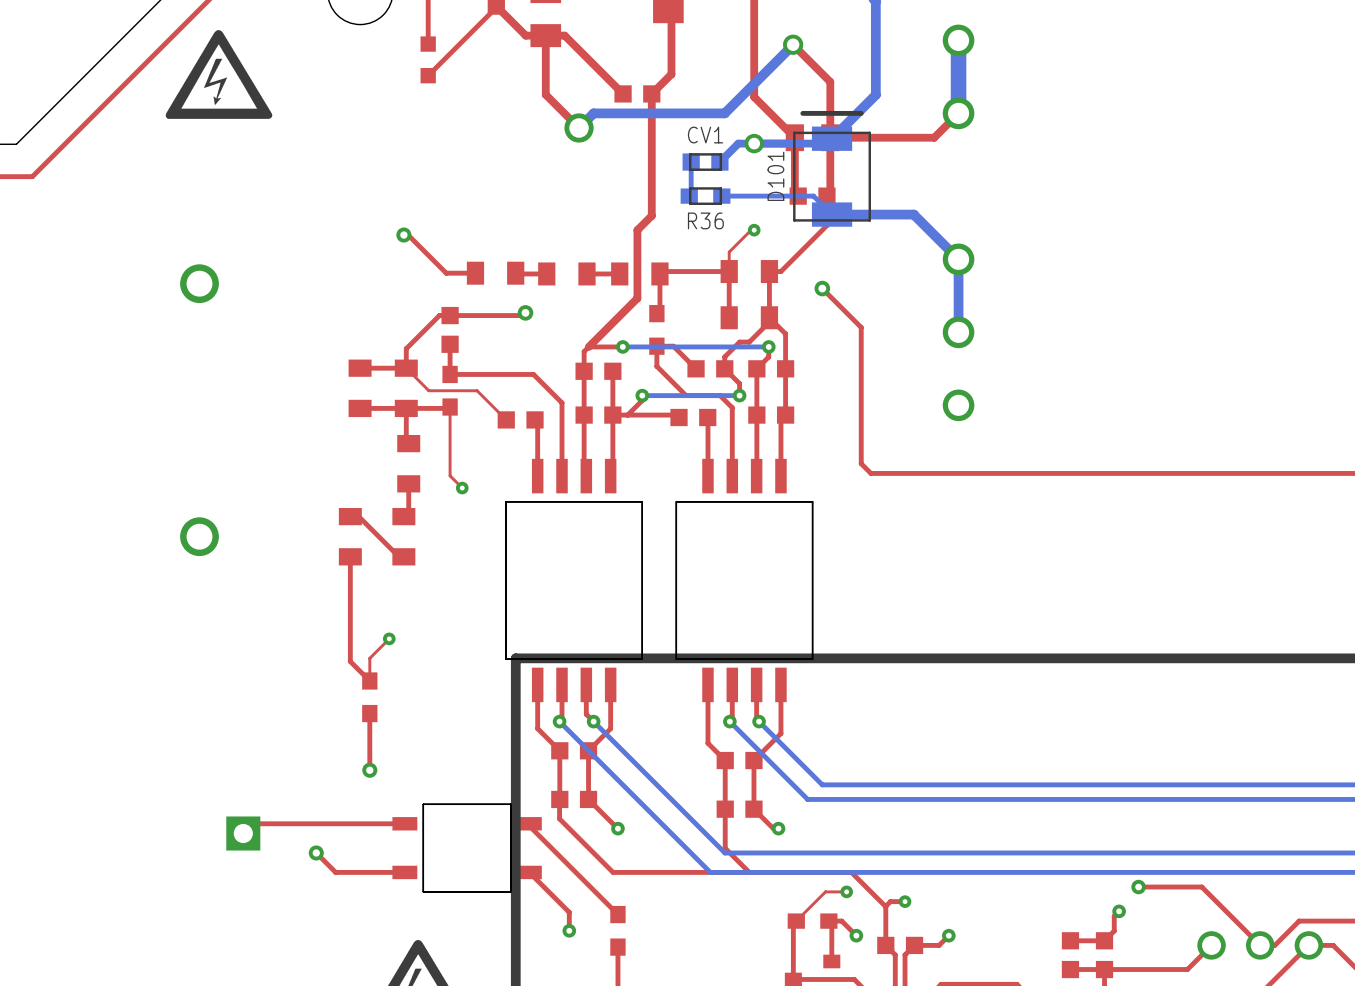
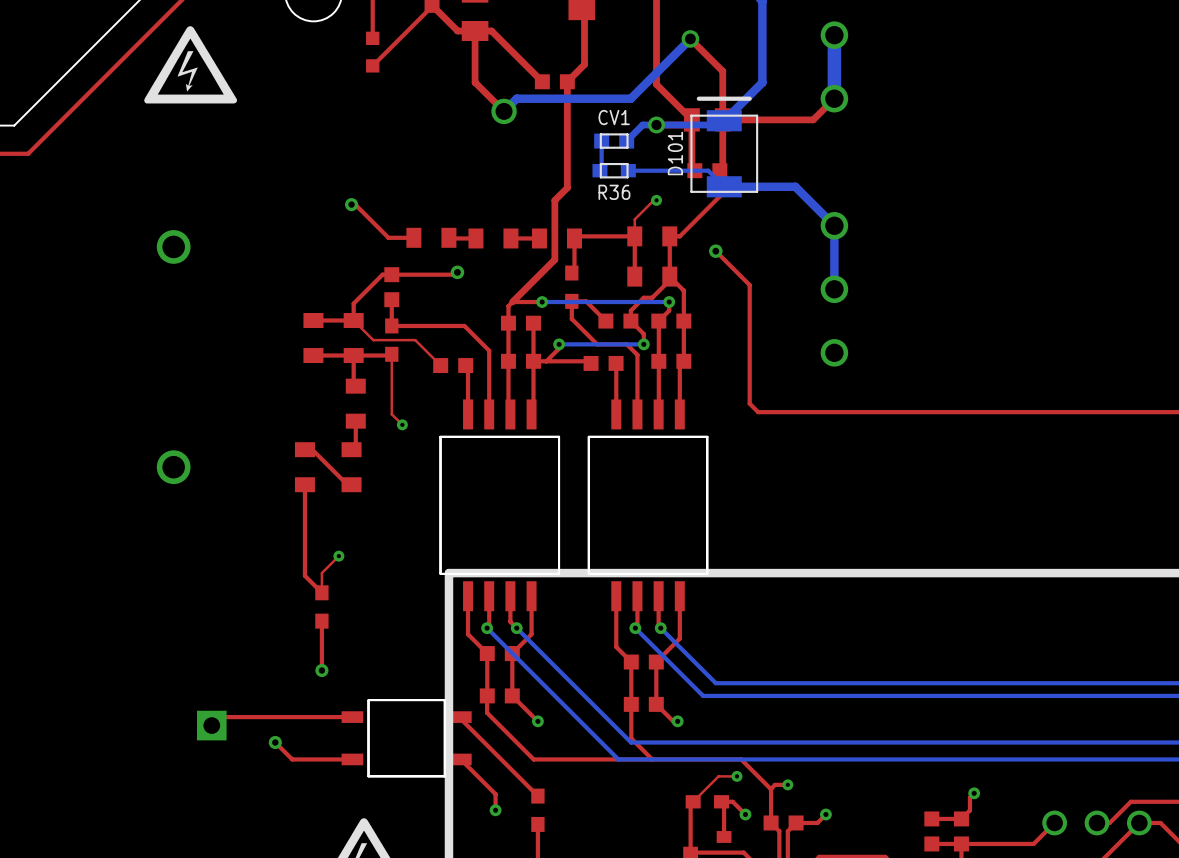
top track: (1138, 887) (1201, 887) (1260, 945) -> none
via: (1138, 887) -> none

